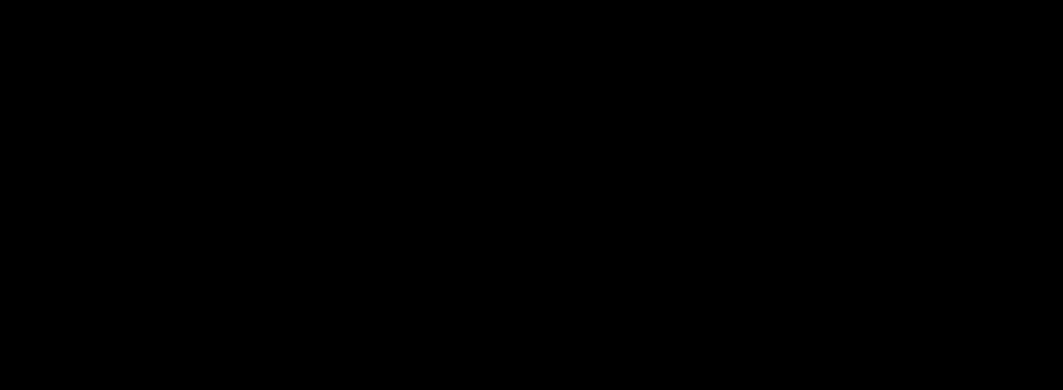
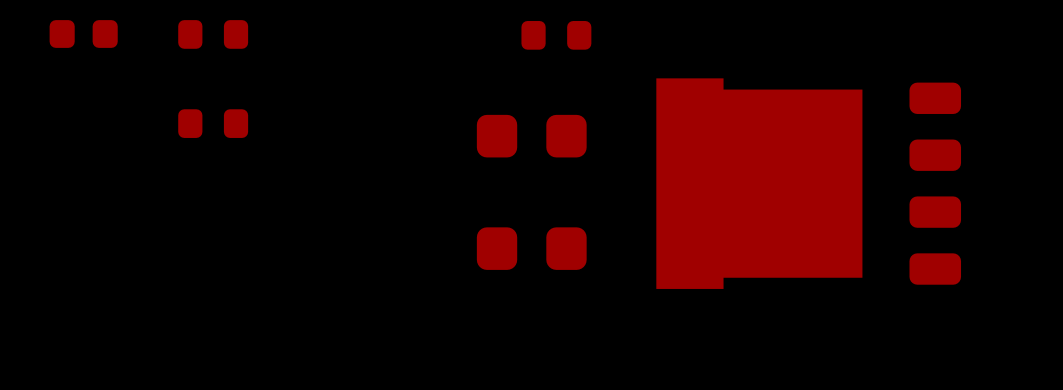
part: none -> (83, 34)
part: none -> (213, 34)
part: none -> (556, 35)
part: none -> (213, 123)
part: none -> (531, 136)
part: none -> (808, 183)
part: none -> (531, 248)

